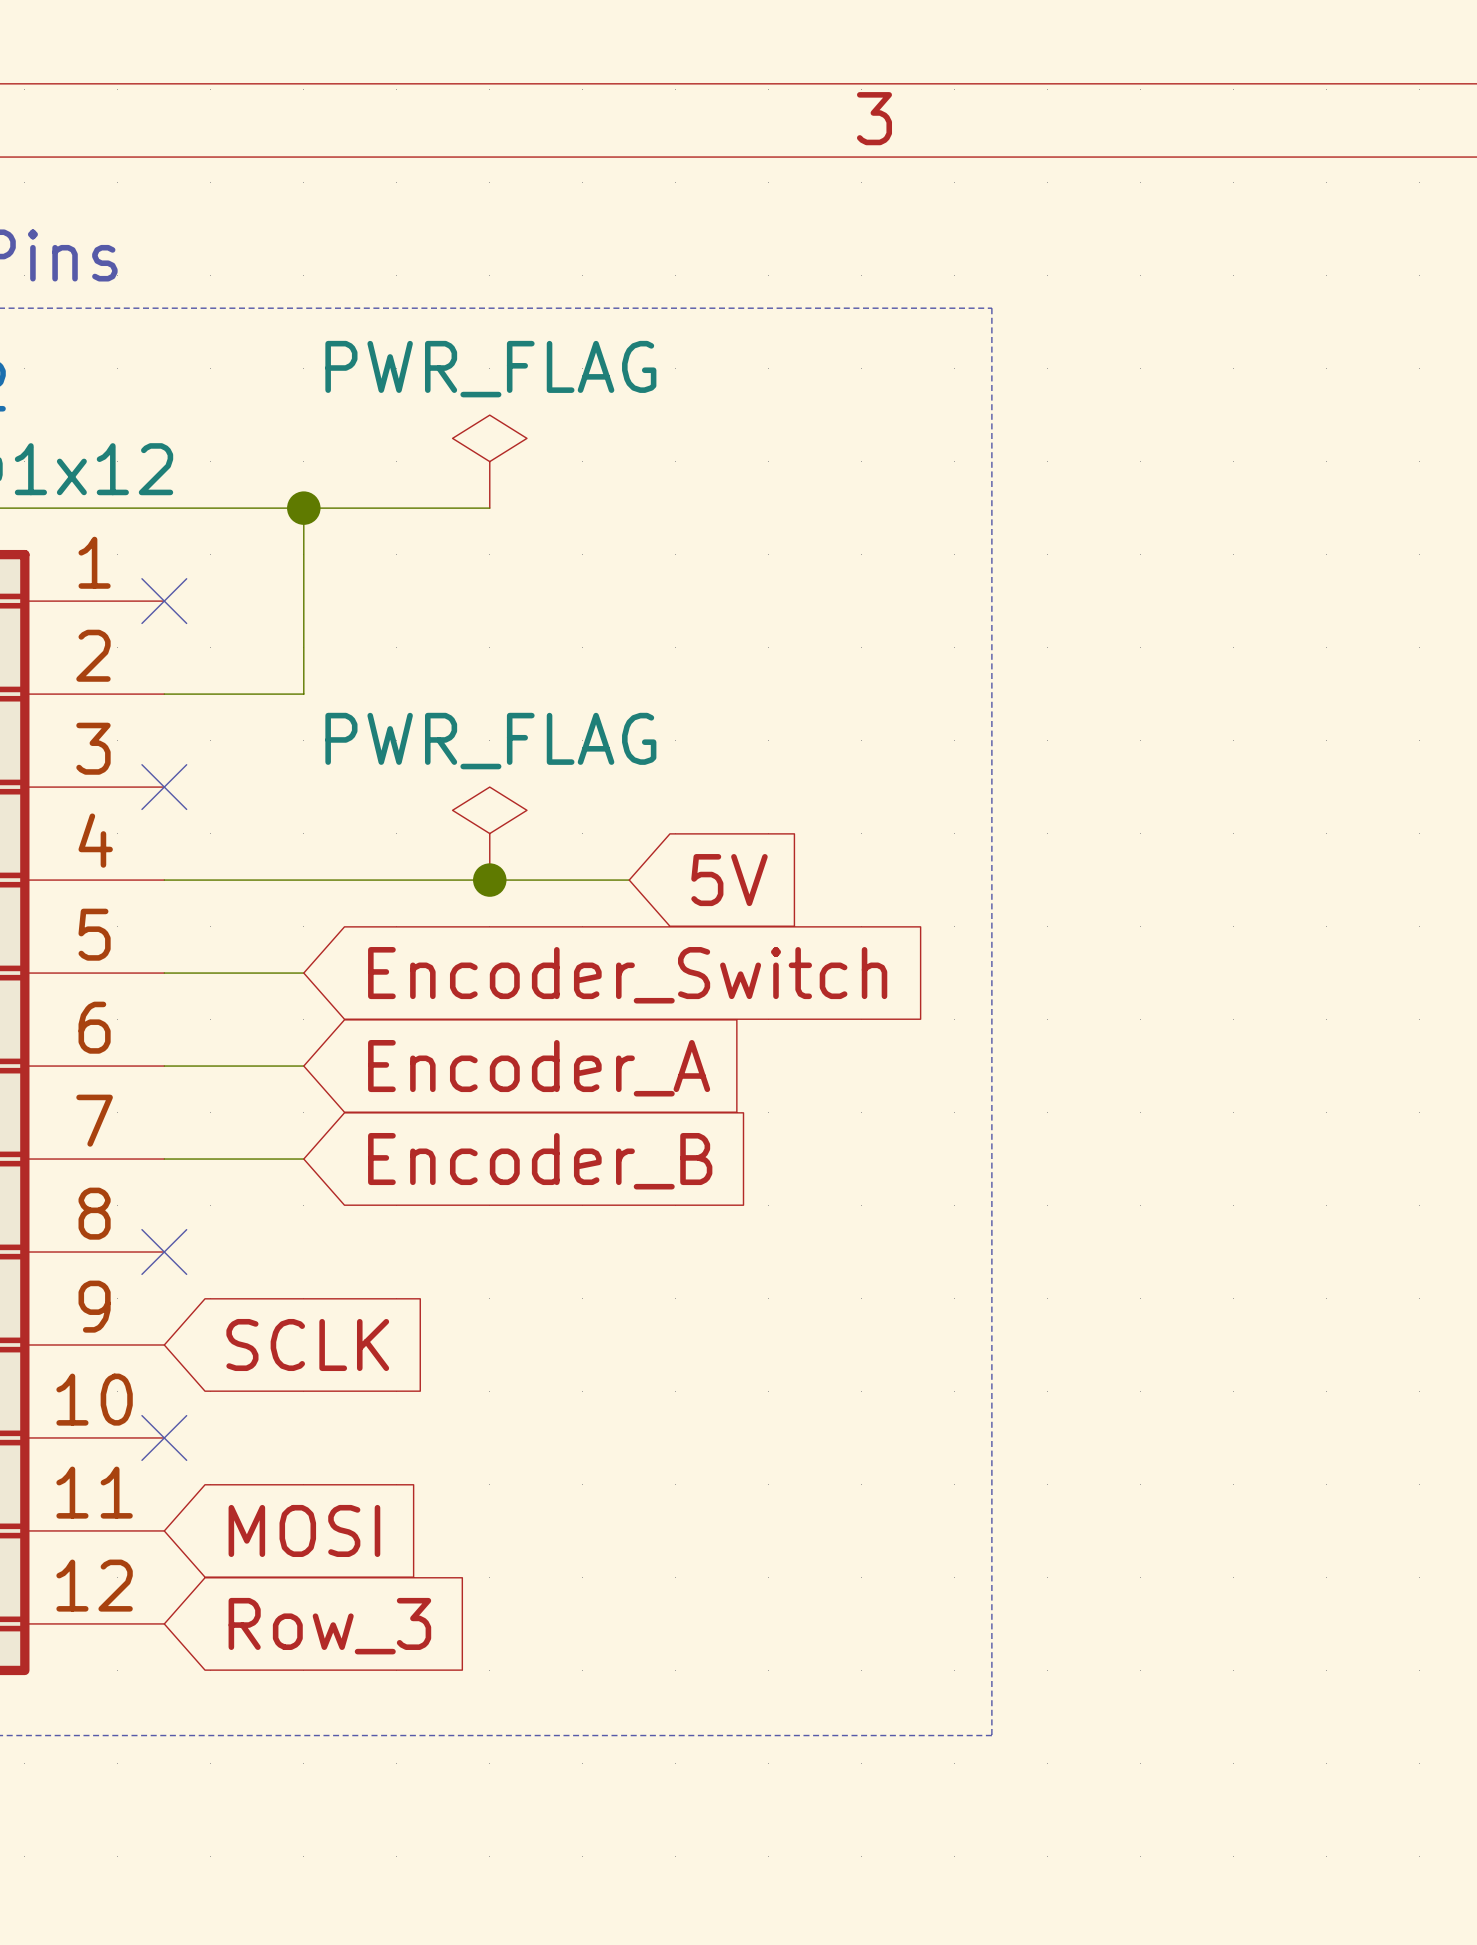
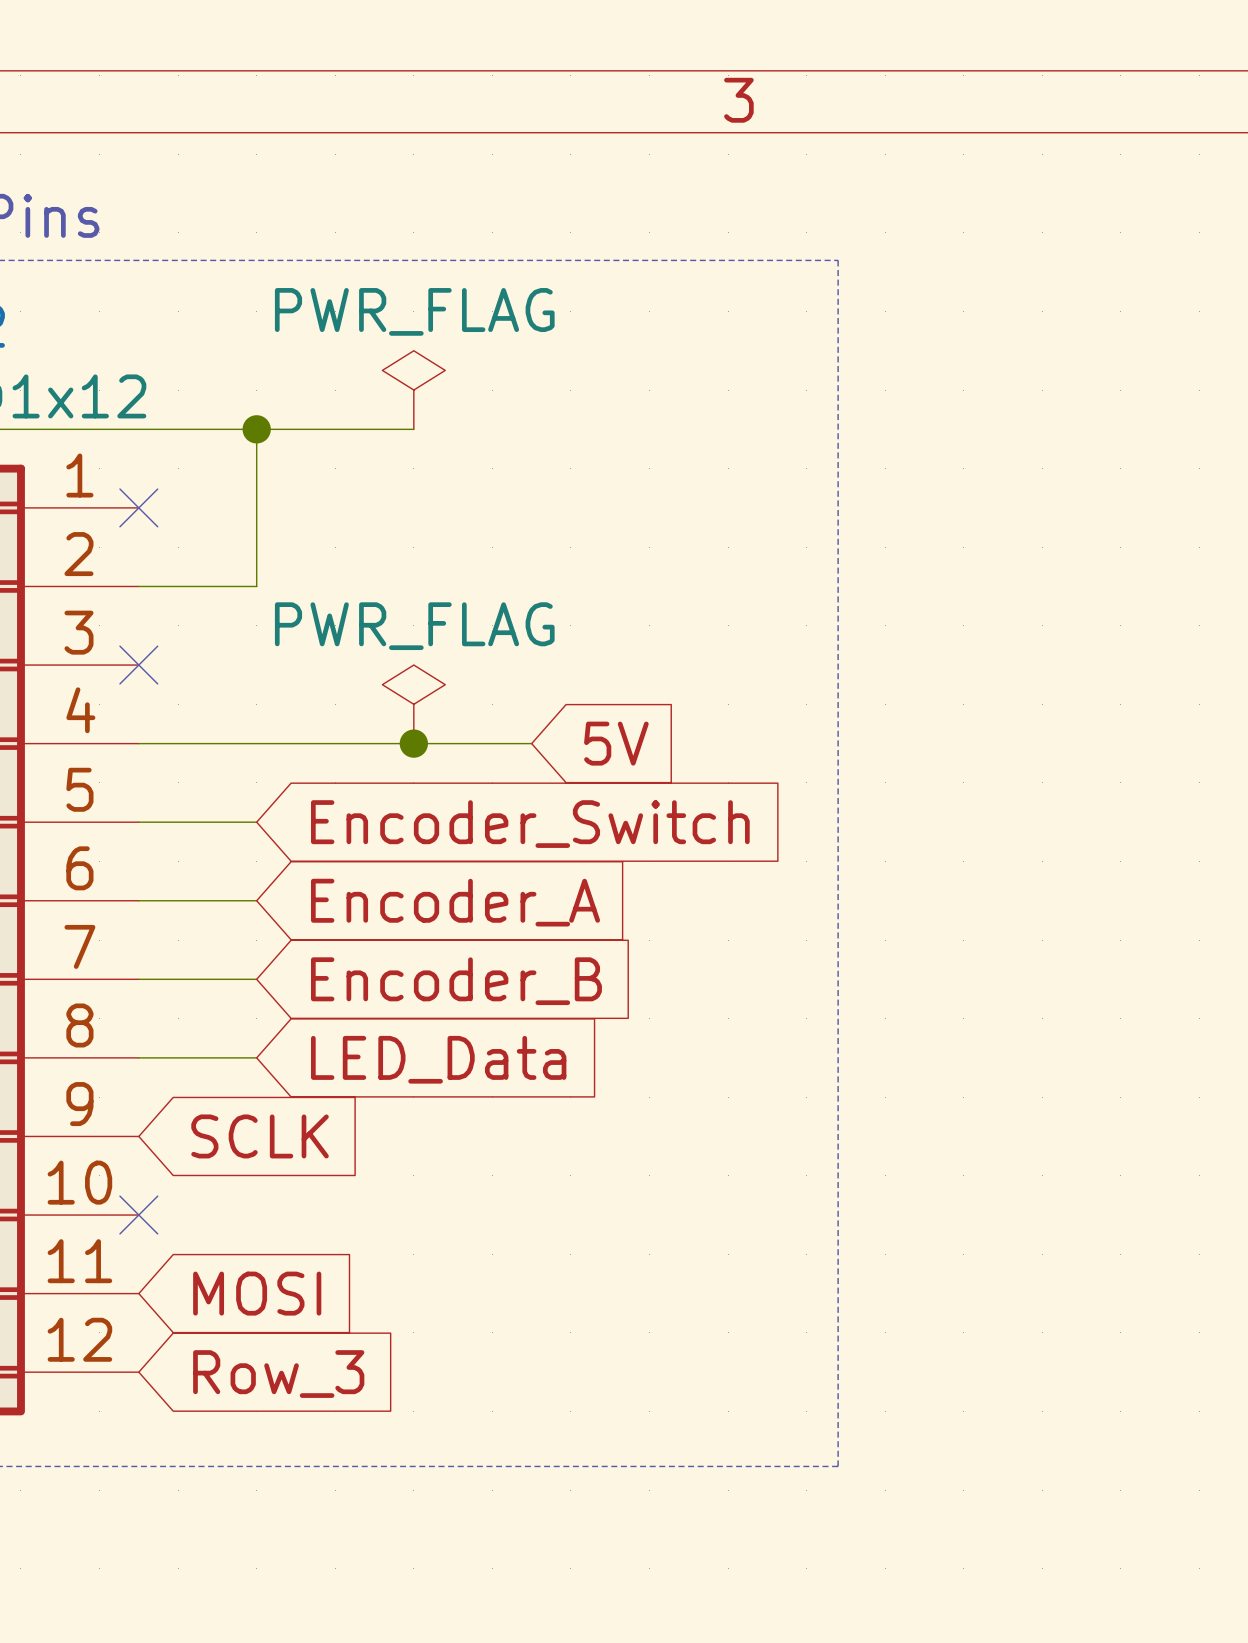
wire: none -> (138, 1057) (256, 1057)
no-connect mark: (164, 1252) -> none
global label: none -> LED_Data (438, 1059)

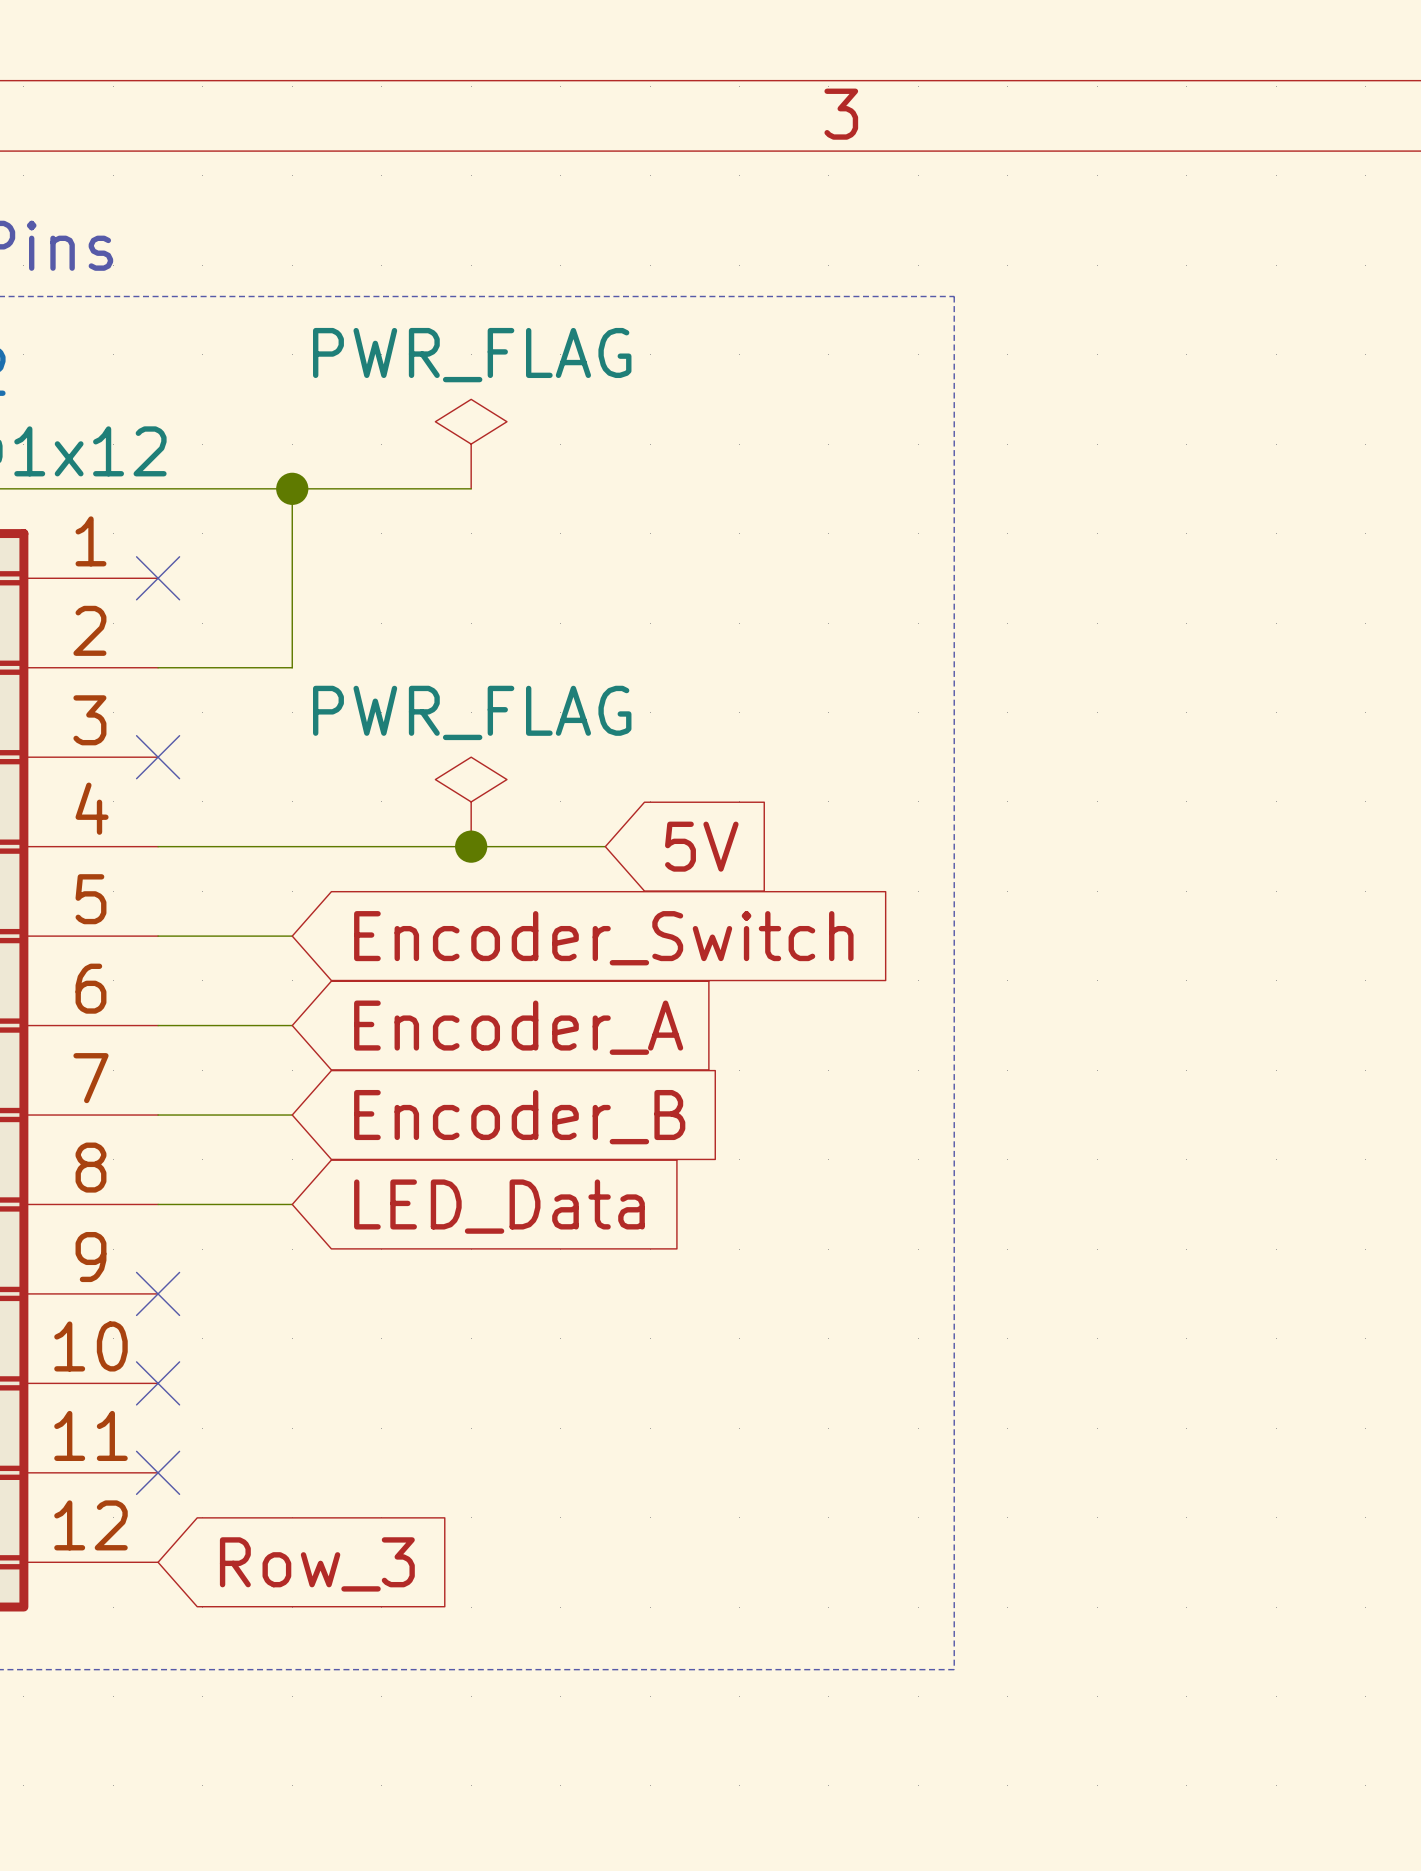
no-connect mark: none -> (158, 1293)
global label: SCLK (260, 1136) -> none
no-connect mark: none -> (158, 1472)
global label: MOSI (257, 1293) -> none

